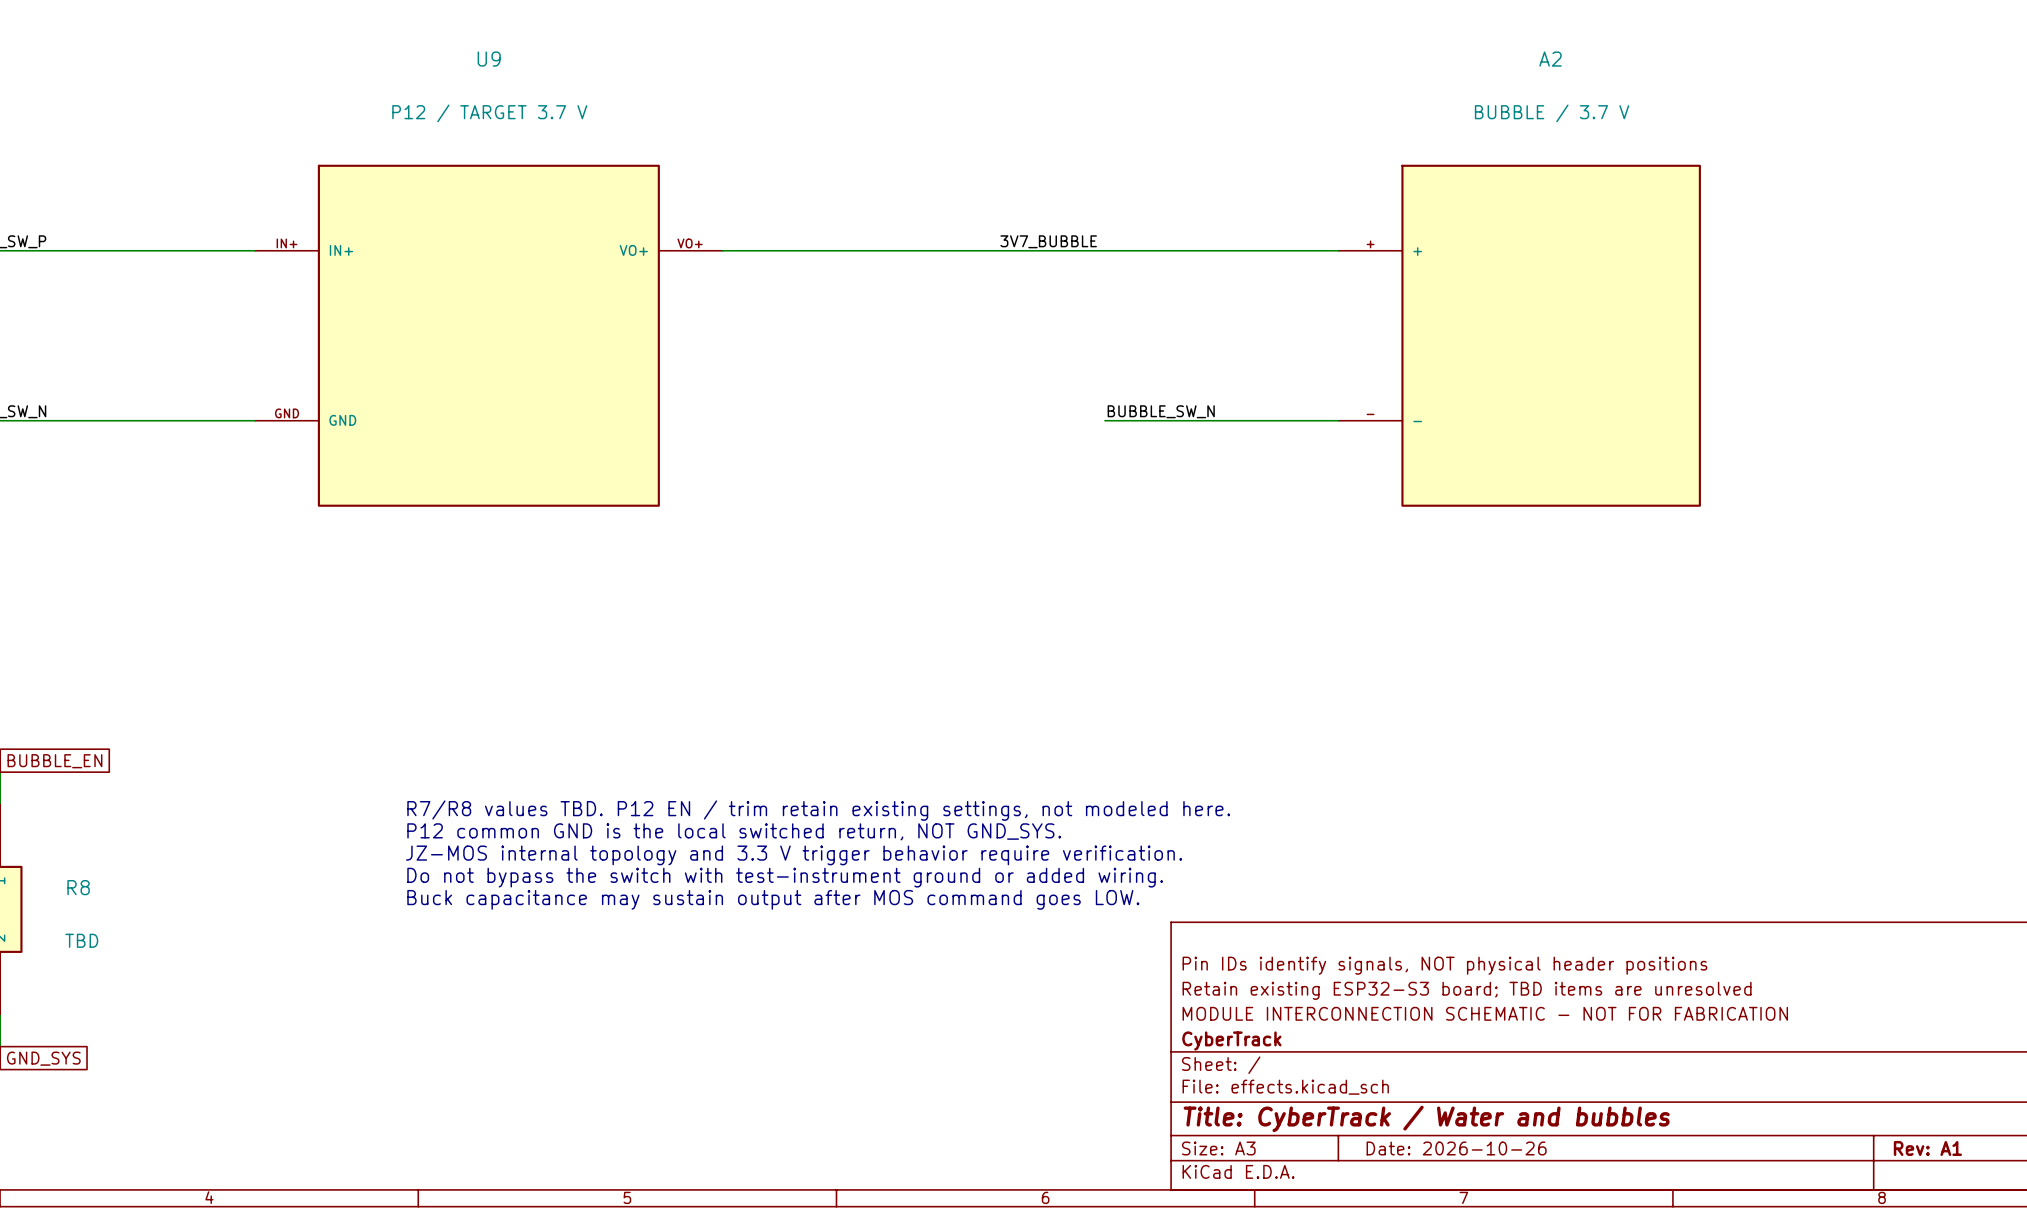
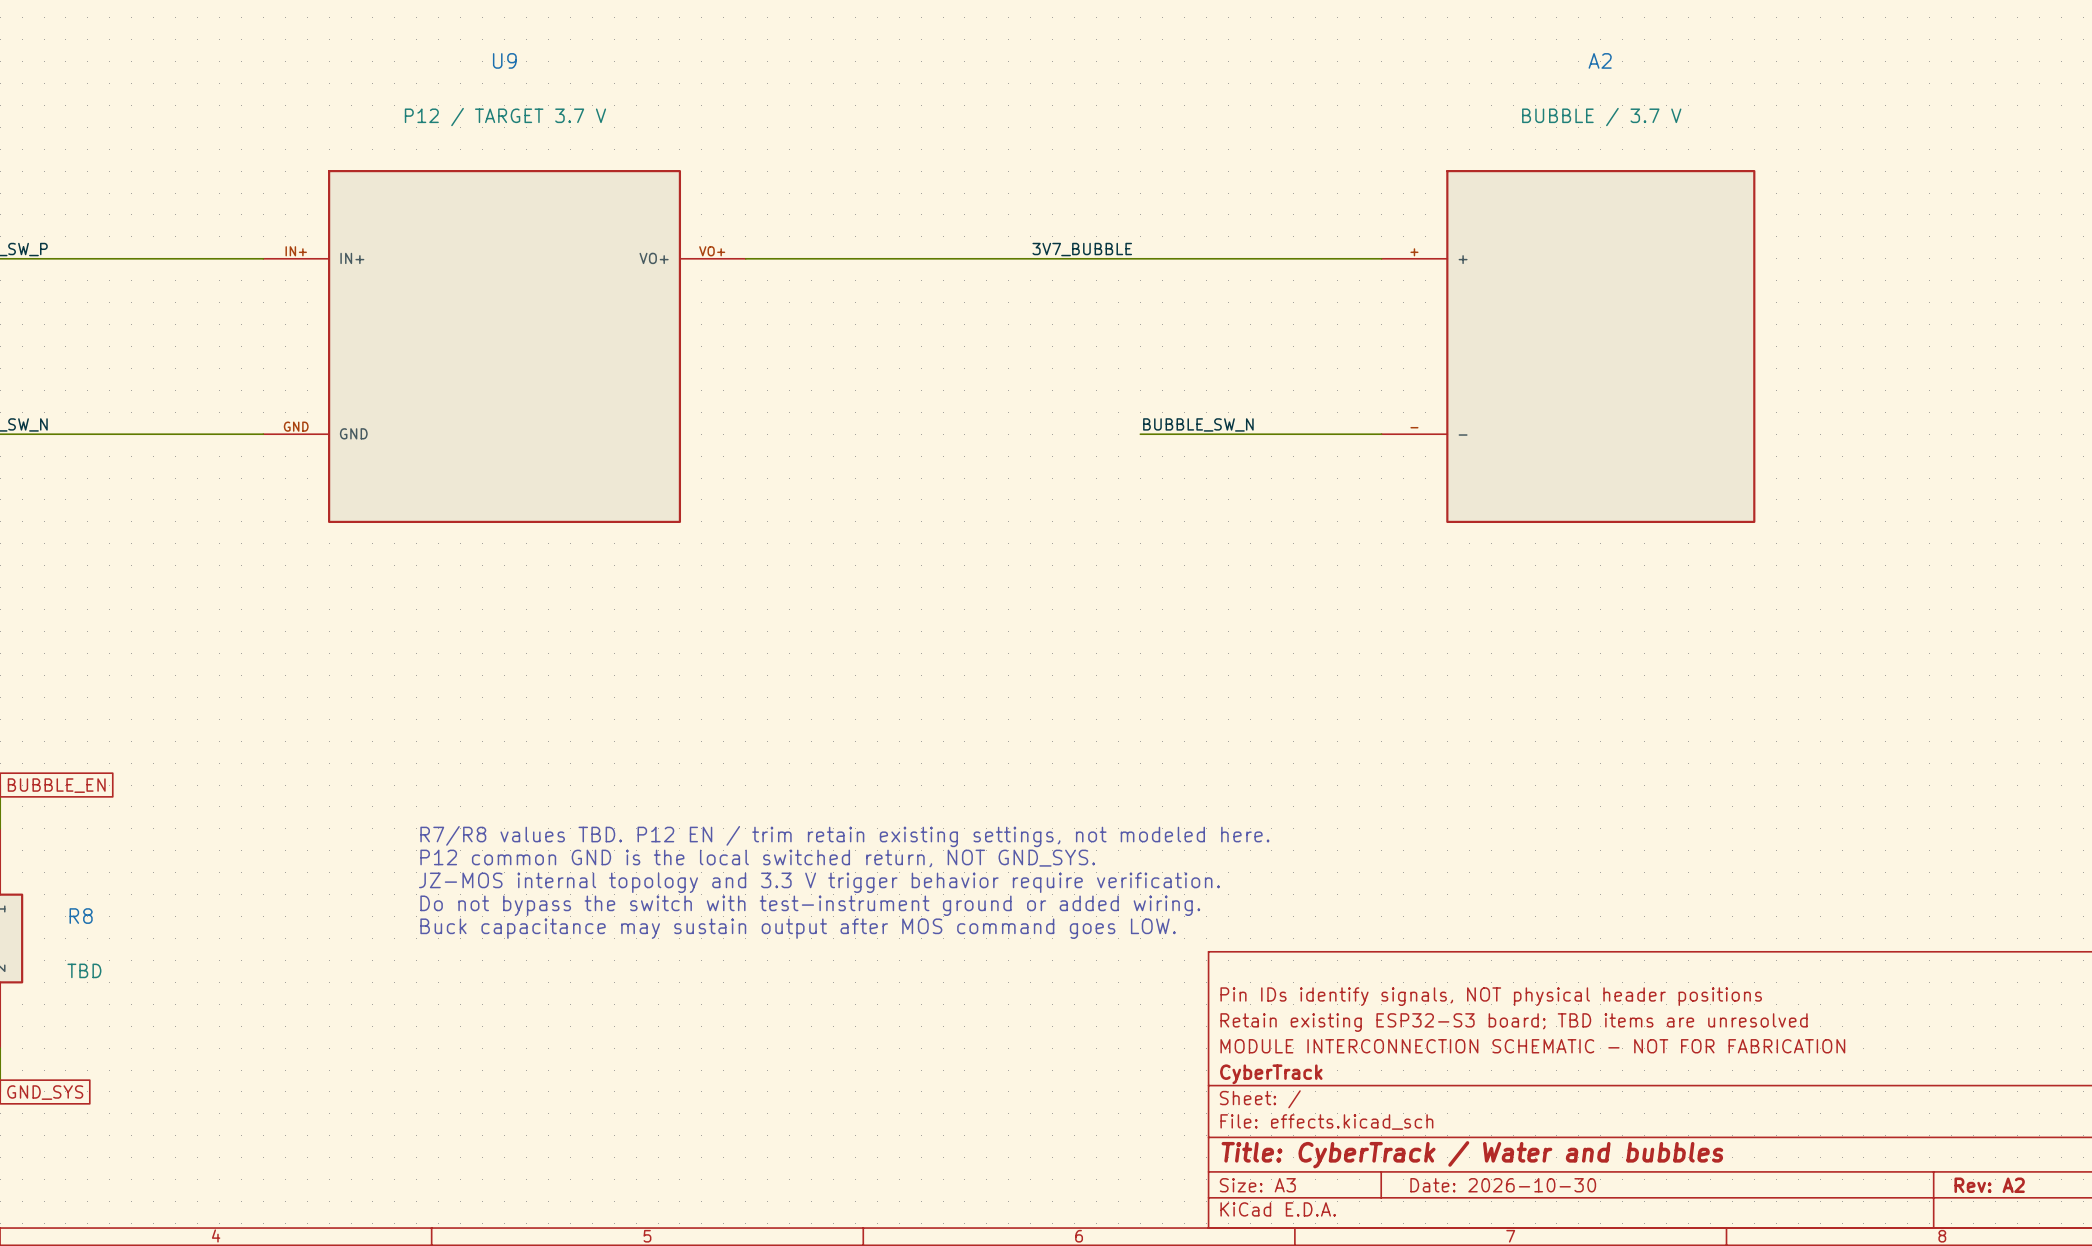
title block: Date: 2026-10-26 (1456, 1148) -> Date: 2026-10-30 (1503, 1185)
title block: Rev: A1 (1927, 1148) -> Rev: A2 (1989, 1185)

